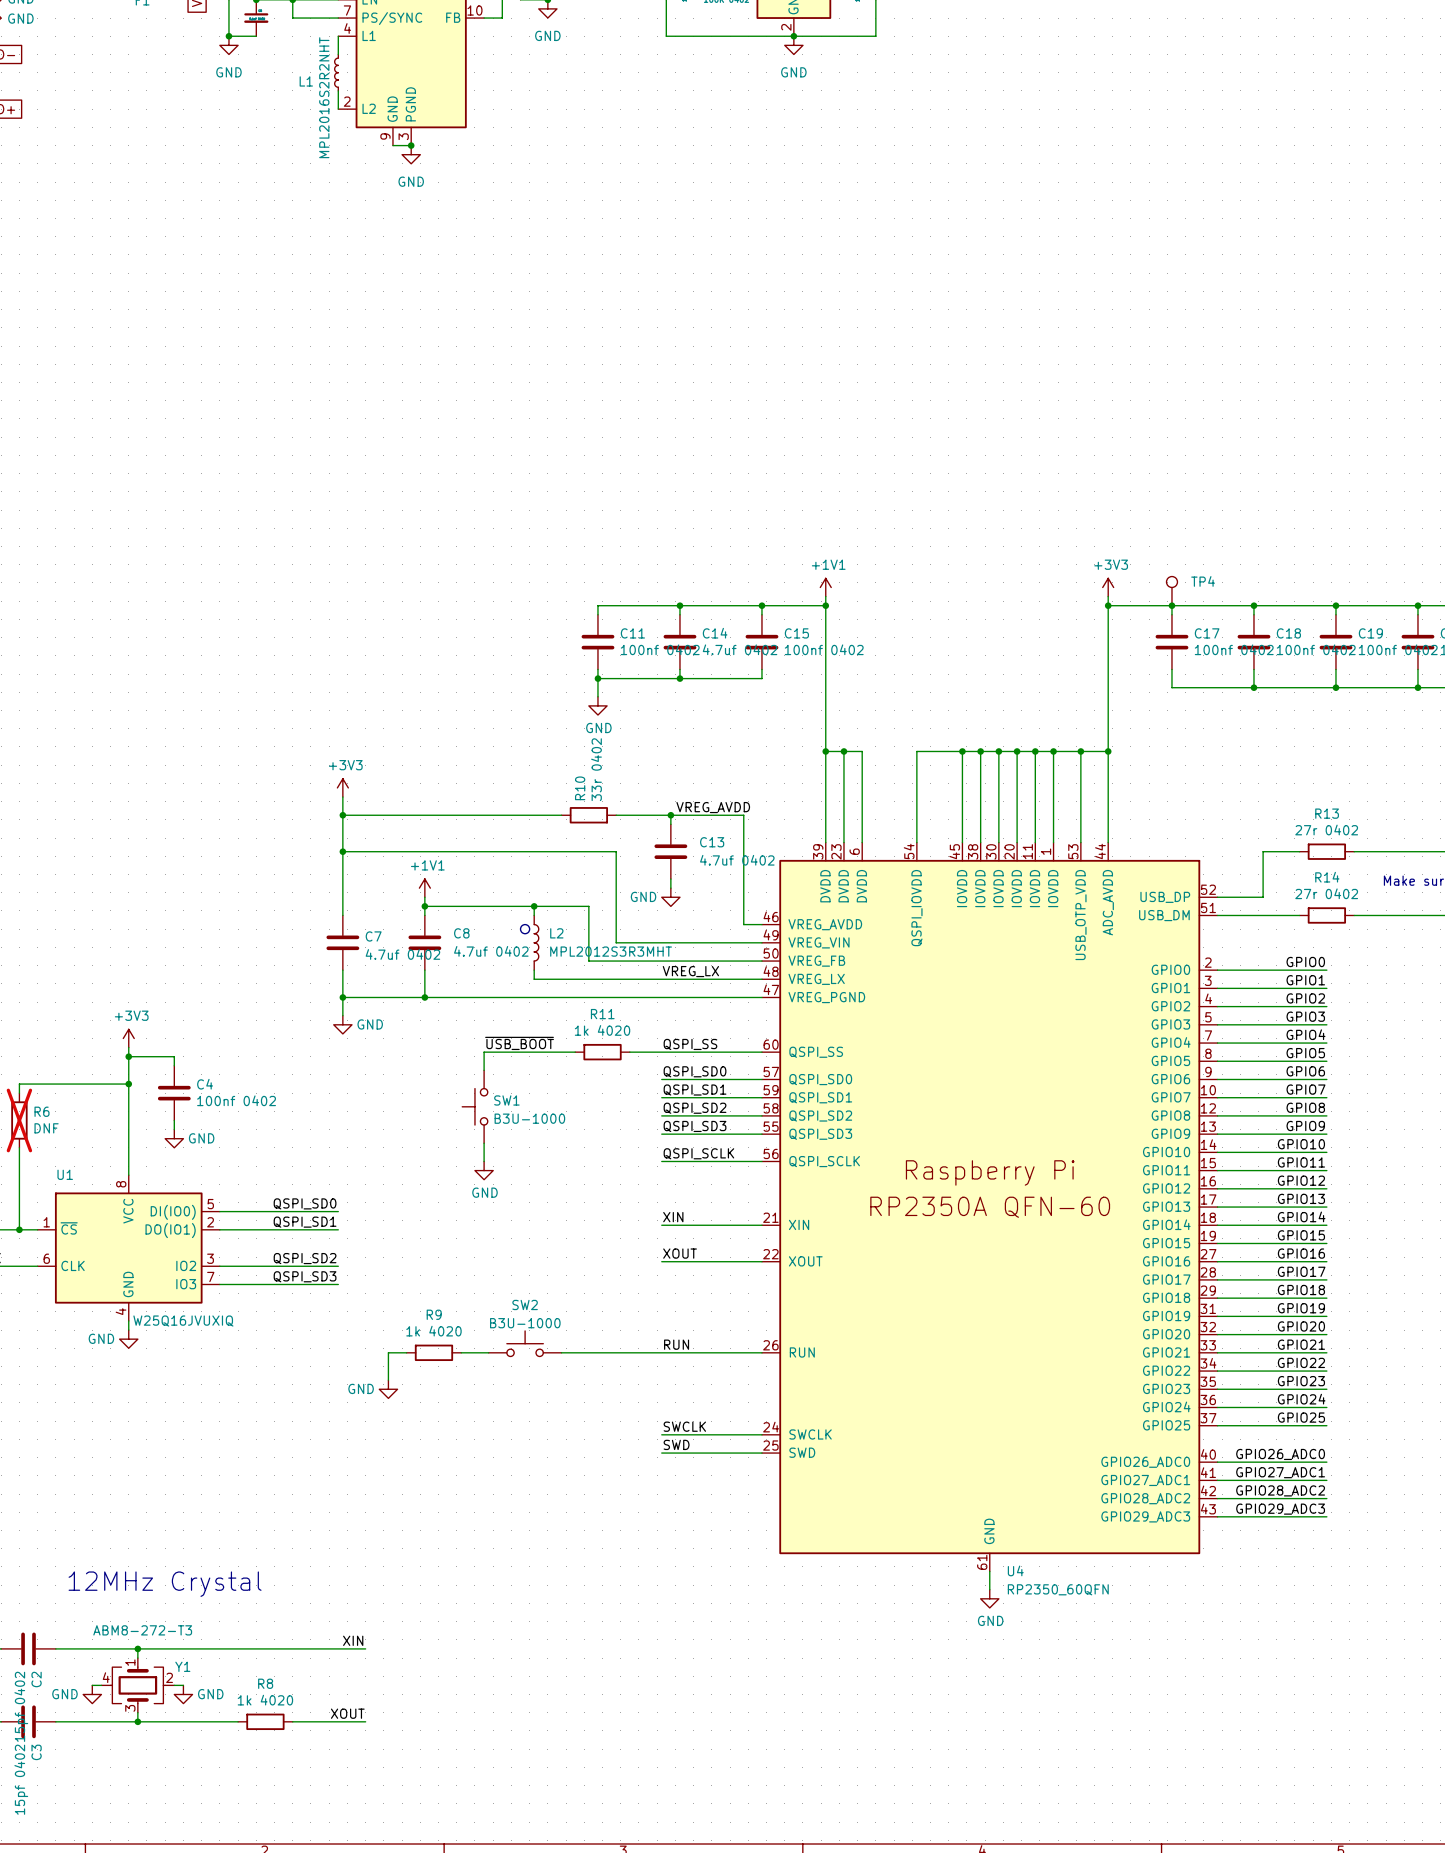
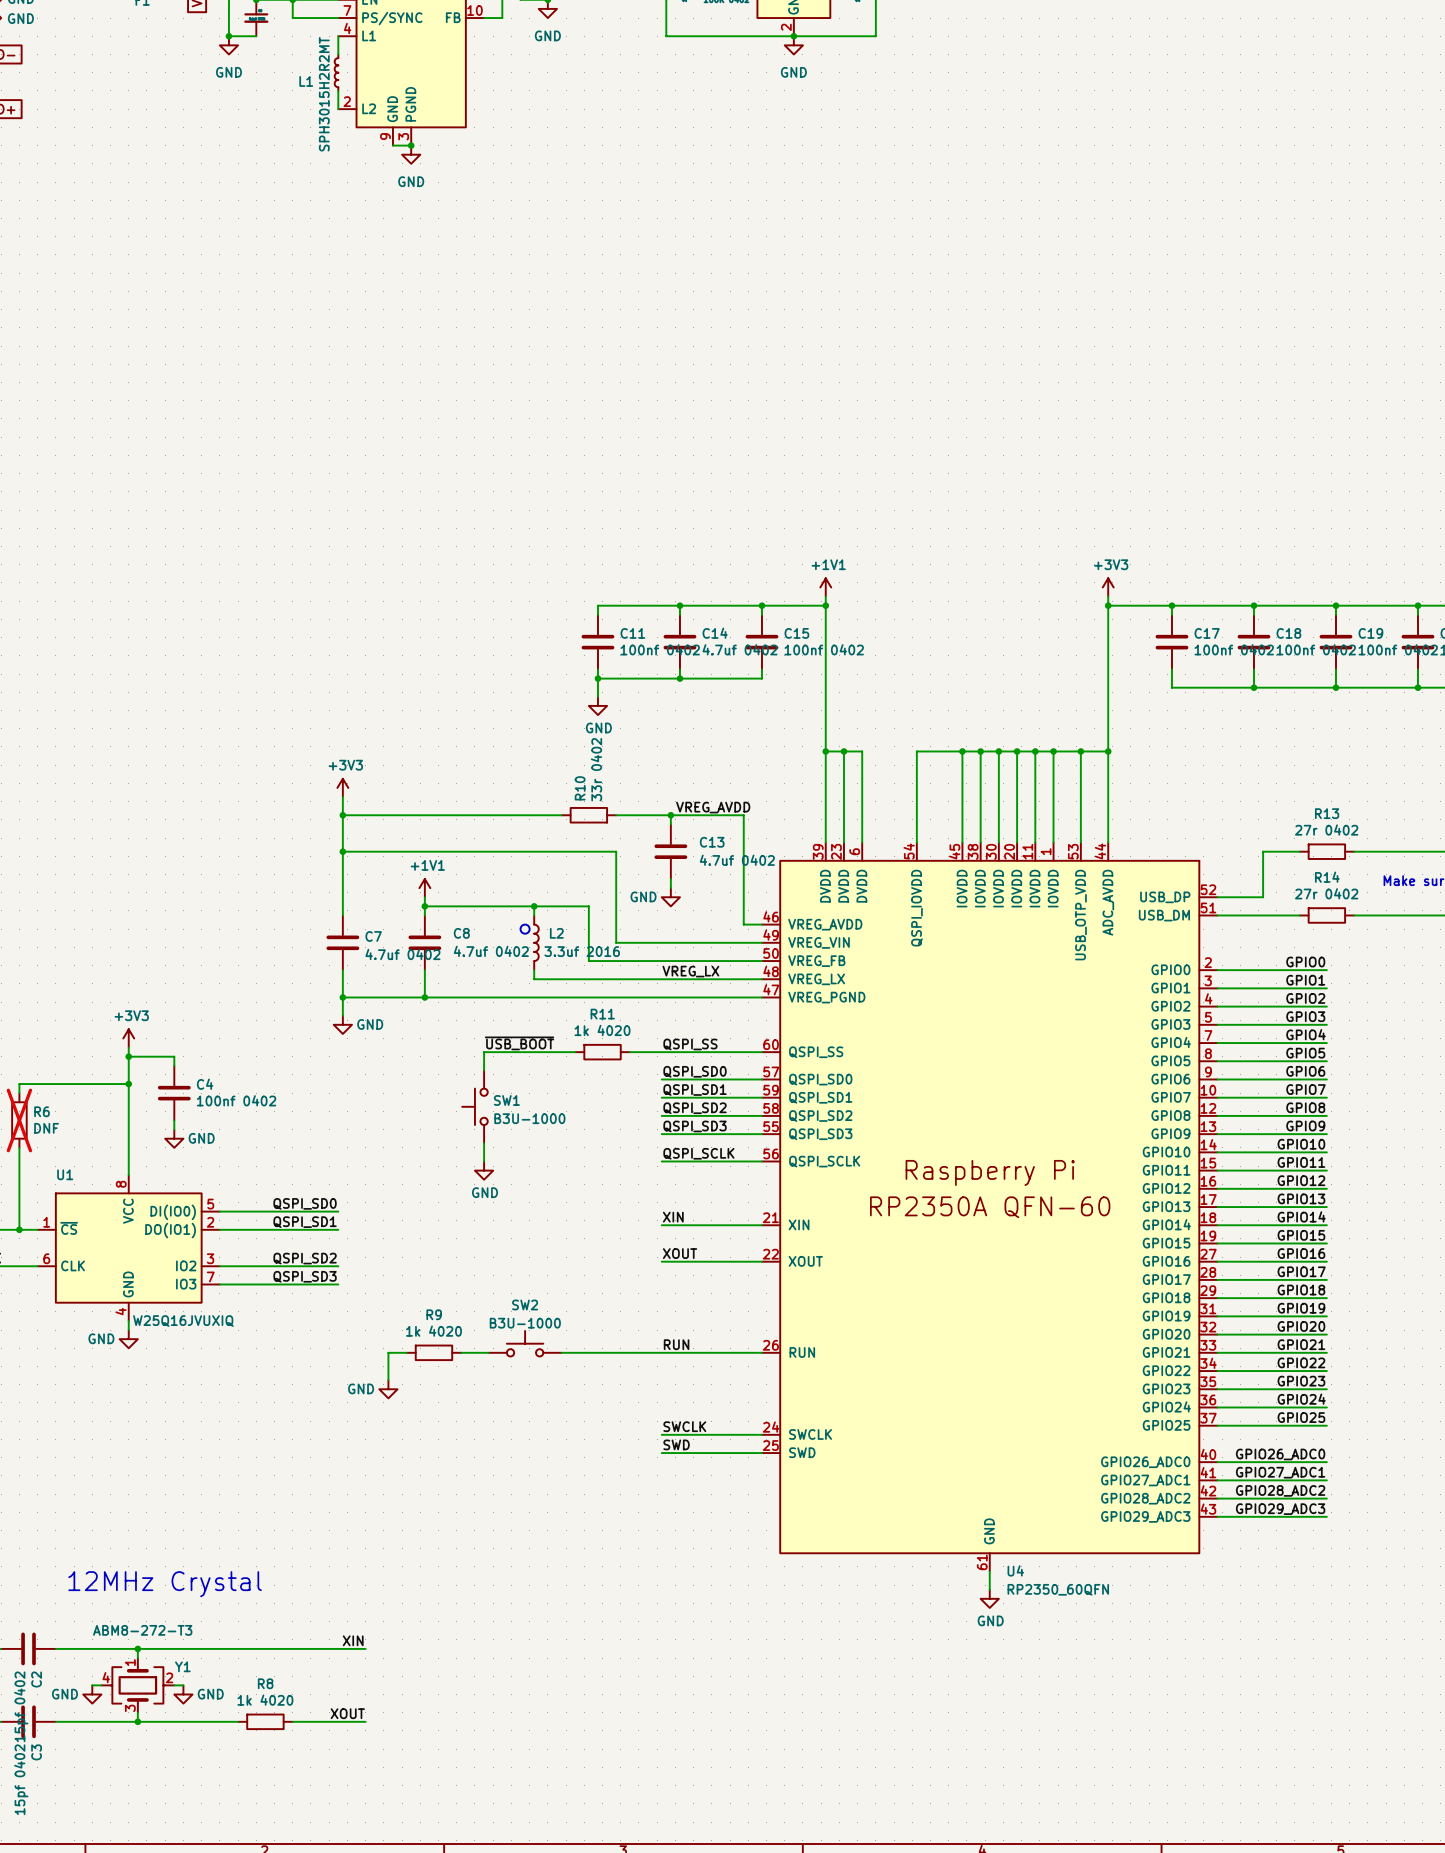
L1 value: MPL2016S2R2NHT (324, 97) -> SPH3015H2R2MT (324, 94)
TP4: (1171, 591) -> none
L2 value: MPL2012S3R3MHT (611, 951) -> 3.3uf 2016 (582, 951)

